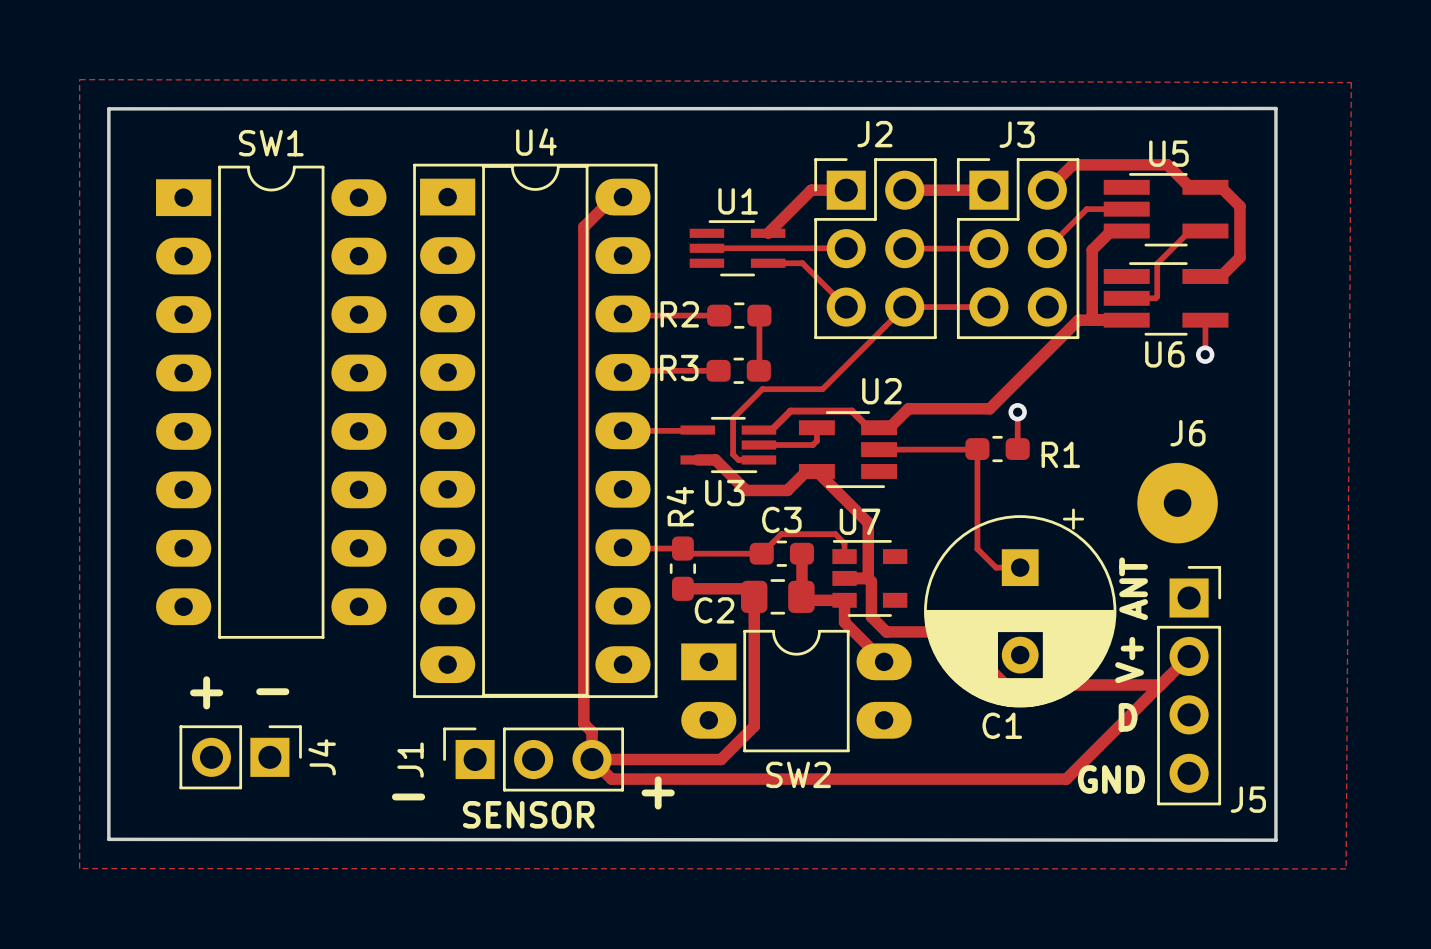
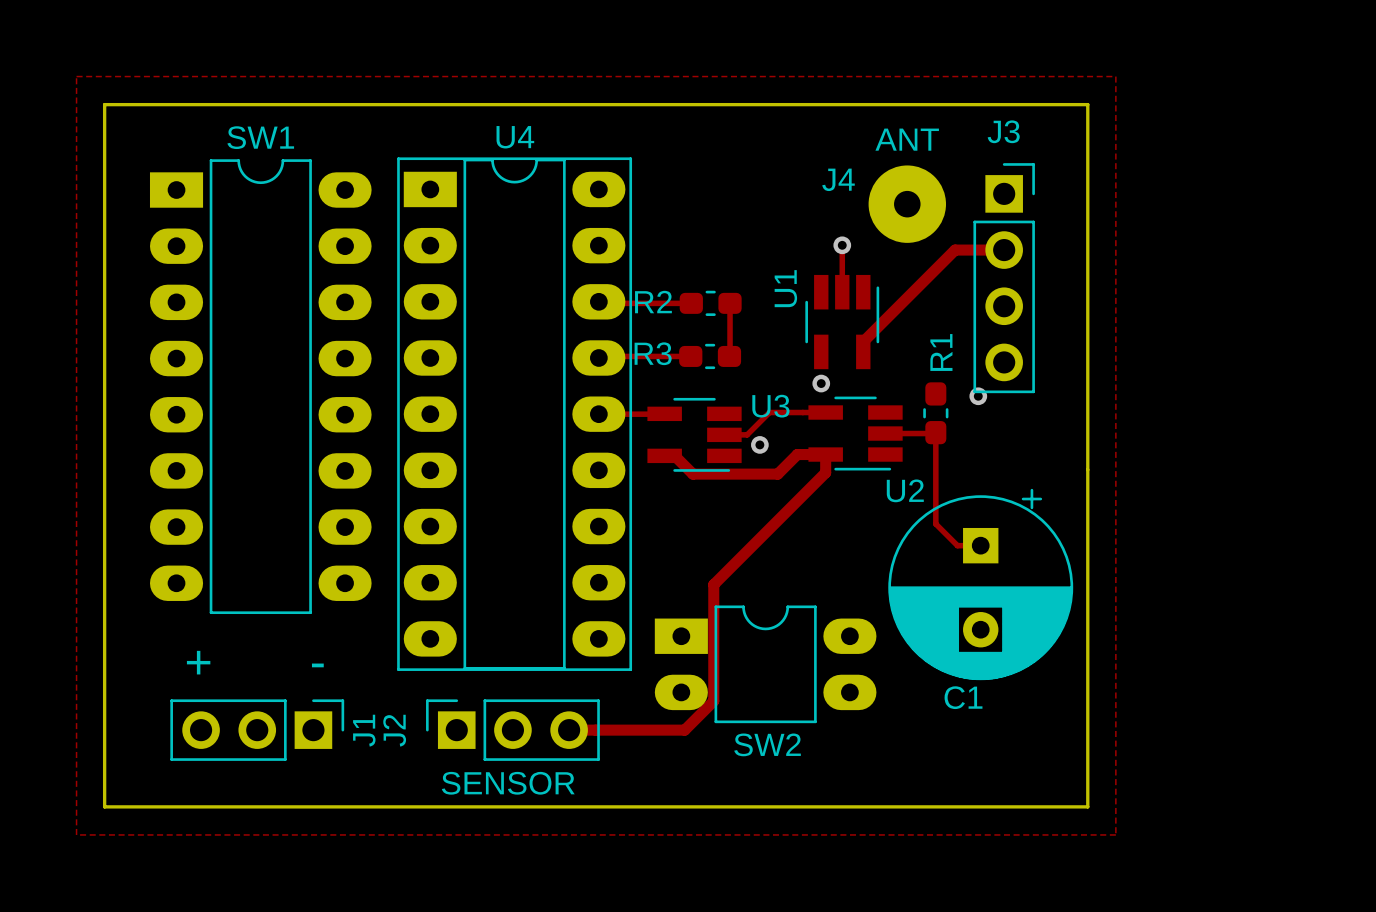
zone outline: (79, 79) (1351, 82) (1346, 868) (79, 868) -> (76, 76) (1115, 76) (1115, 834) (76, 834)
board edge: (108, 108) (1275, 108) (1275, 840) (108, 839) -> (104, 104) (1087, 104) (1087, 806) (104, 806)
J3 footprint: [956, 158, 1080, 340] -> [973, 163, 1035, 394]
track: (846, 190) (811, 190) (768, 233) -> none
track: (904, 190) (988, 190) -> none
track: (1047, 190) (1072, 164) (1167, 164) (1189, 187) (1220, 187) (1239, 206) (1239, 257) (1220, 276) (1205, 276) -> none
track: (622, 197) (613, 197) (583, 227) (583, 723) (592, 731) (592, 759) (611, 779) (1066, 779) (1189, 656) -> none
U1 name position: U1 (738, 201) -> U1 (785, 288)
track: (1126, 209) (1086, 209) (1047, 248) -> none
U5: (1166, 209) -> none
U1 footprint: [689, 220, 786, 277] -> [805, 274, 880, 370]
track: (1126, 231) (1111, 231) (1092, 250) (1092, 320) -> none
track: (1205, 231) (1189, 231) (1157, 263) (1157, 296) (1155, 298) (1126, 298) -> none
track: (706, 248) (846, 248) -> none
J2: (875, 248) -> none
track: (904, 248) (988, 248) -> none
track: none -> (842, 245) (842, 292)
via: none -> (842, 245)
track: none -> (1004, 250) (955, 250) (863, 341) (863, 351)
track: (768, 263) (802, 263) (846, 307) -> none
U6: (1166, 298) -> none
track: (988, 307) (904, 307) (822, 389) (762, 389) (733, 418) (733, 454) (738, 459) (758, 459) -> none
track: (1126, 320) (1078, 320) (989, 408) (908, 408) (889, 427) (868, 427) (851, 411) (790, 411) (771, 430) (758, 430) -> none
track: (1205, 320) (1205, 354) -> none
via: (1205, 354) -> none
U2 name position: U2 (881, 391) -> U2 (905, 490)
via: none -> (821, 383)
track: (1017, 412) (1017, 449) -> none
U3 footprint: [680, 416, 777, 474] -> [647, 397, 742, 472]
track: (816, 427) (816, 440) (812, 445) (758, 445) -> none
track: none -> (825, 412) (769, 412) (747, 434) (724, 434)
U2 position: (847, 449) -> (855, 433)
track: (879, 449) (977, 449) (977, 549) -> (885, 433) (935, 432) (935, 523) (939, 527)
R1 rotation: 0° (997, 449) -> 90° clockwise (935, 413)
R1 name position: R1 (1060, 454) -> R1 (941, 352)
track: (697, 459) (715, 459) (746, 490) (787, 490) (806, 471) (827, 471) -> none
via: none -> (759, 444)
track: (816, 471) (868, 522) (868, 578) -> none
U3 name position: U3 (724, 493) -> U3 (770, 406)
J6: (1177, 503) -> none
track: (623, 546) (623, 548) (682, 548) (688, 553) (761, 553) (781, 534) (835, 534) (844, 543) (844, 556) -> none
C3: (781, 553) -> none
track: (801, 553) (801, 596) (804, 600) (844, 600) (844, 622) (884, 661) -> none
R4: (682, 568) -> none
track: (868, 578) (871, 581) (871, 616) (886, 631) (952, 631) (1005, 684) (1160, 684) -> none
U7: (869, 578) -> none
track: (682, 588) (746, 588) (754, 596) (754, 726) (721, 759) (712, 759) -> (664, 455) (674, 455) (692, 474) (777, 474) (797, 454) (825, 454) (825, 472) (713, 584) (713, 701) (684, 730)
text rotation: 0° (1133, 588) -> 90° clockwise (907, 139)
text position: ANT (1133, 588) -> ANT (907, 139)
C2: (777, 596) -> none
text: V+ (1129, 660) -> none
J5: (1189, 685) -> none
text position: - (272, 691) -> - (317, 665)
text: D (1128, 717) -> none
J4 footprint: [179, 725, 302, 790] -> [868, 165, 947, 243]
J4 name position: J4 (322, 757) -> J4 (838, 179)
J1: none -> (257, 730)
J1 name: J1 (410, 760) -> J2 (394, 730)
text: GND (1111, 779) -> none
text: + (658, 792) -> none
text: - (408, 796) -> none

